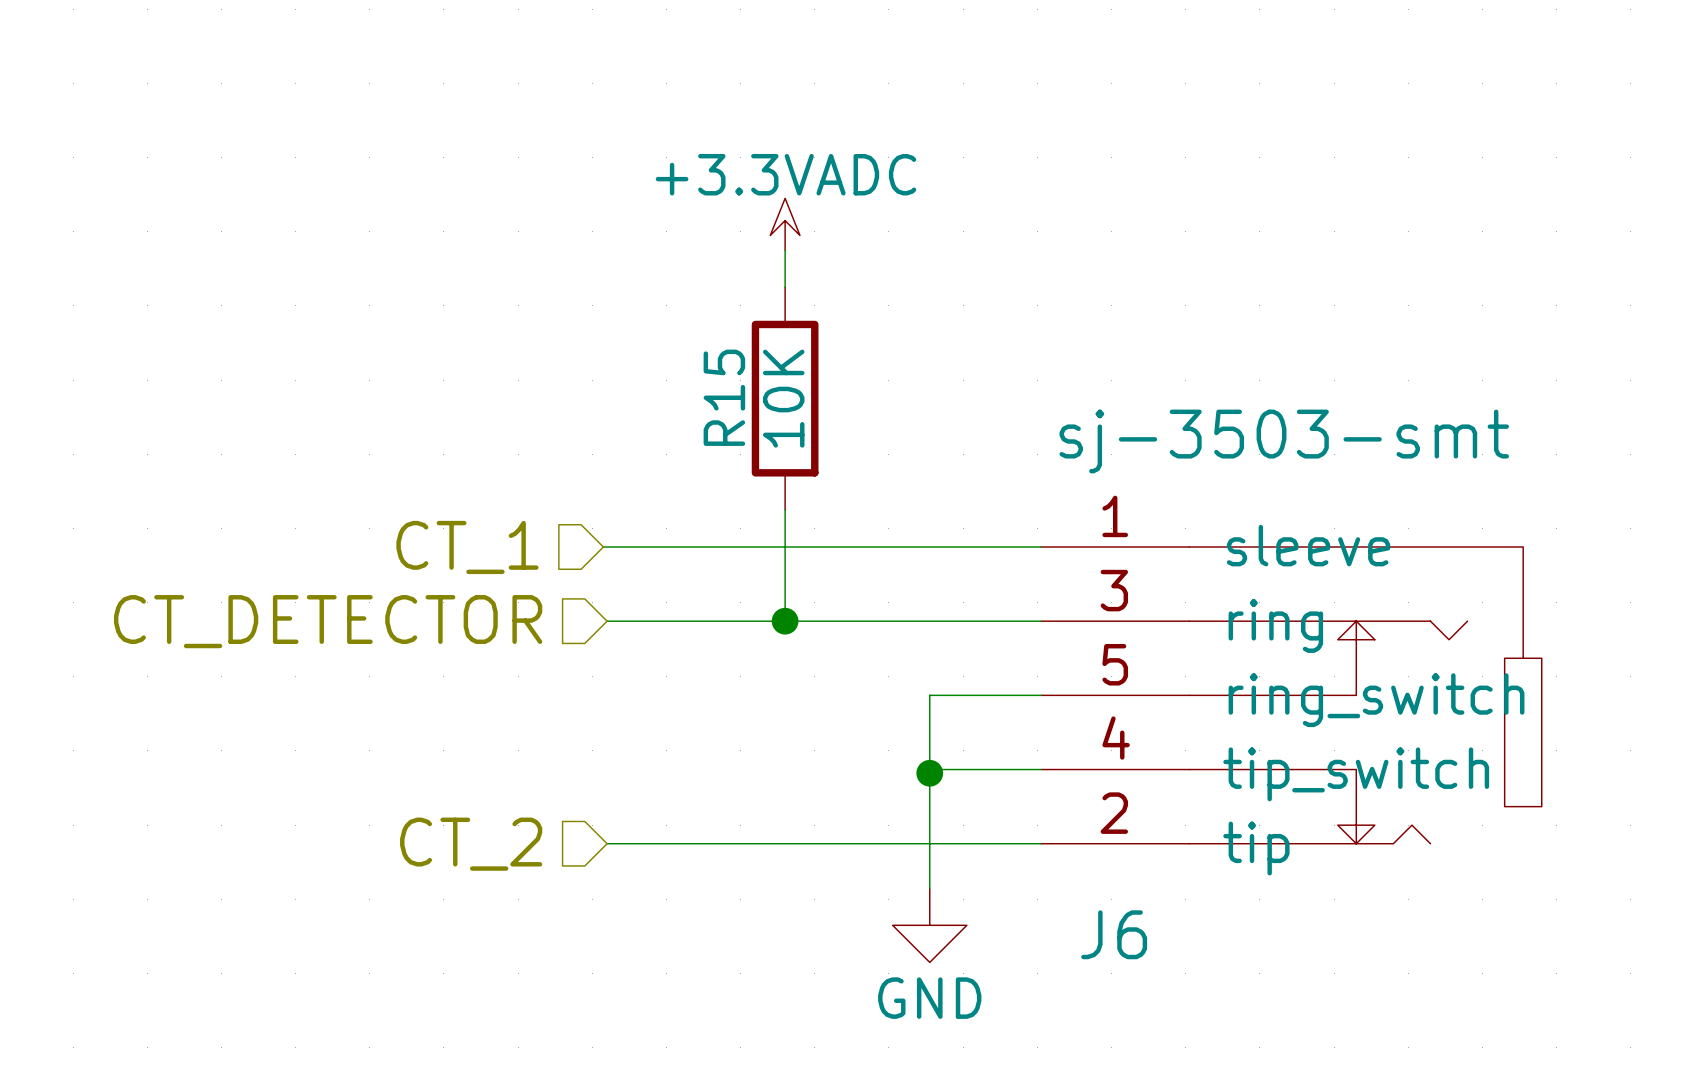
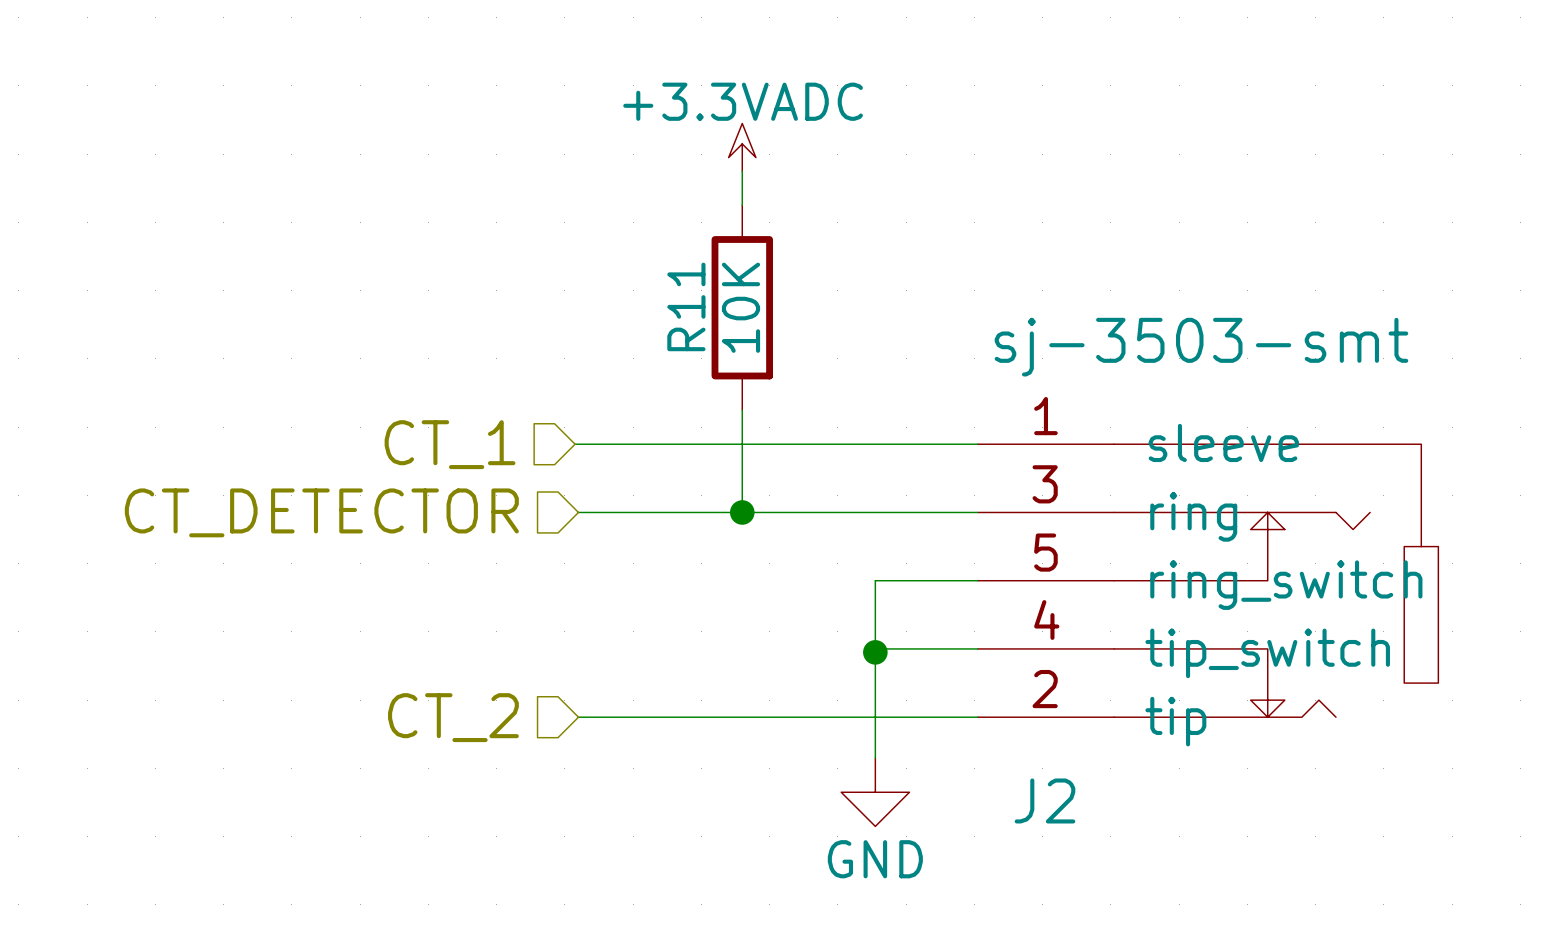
R15 name: R15 (724, 397) -> R11 (686, 306)
J6 name: J6 (1114, 934) -> J2 (1044, 800)

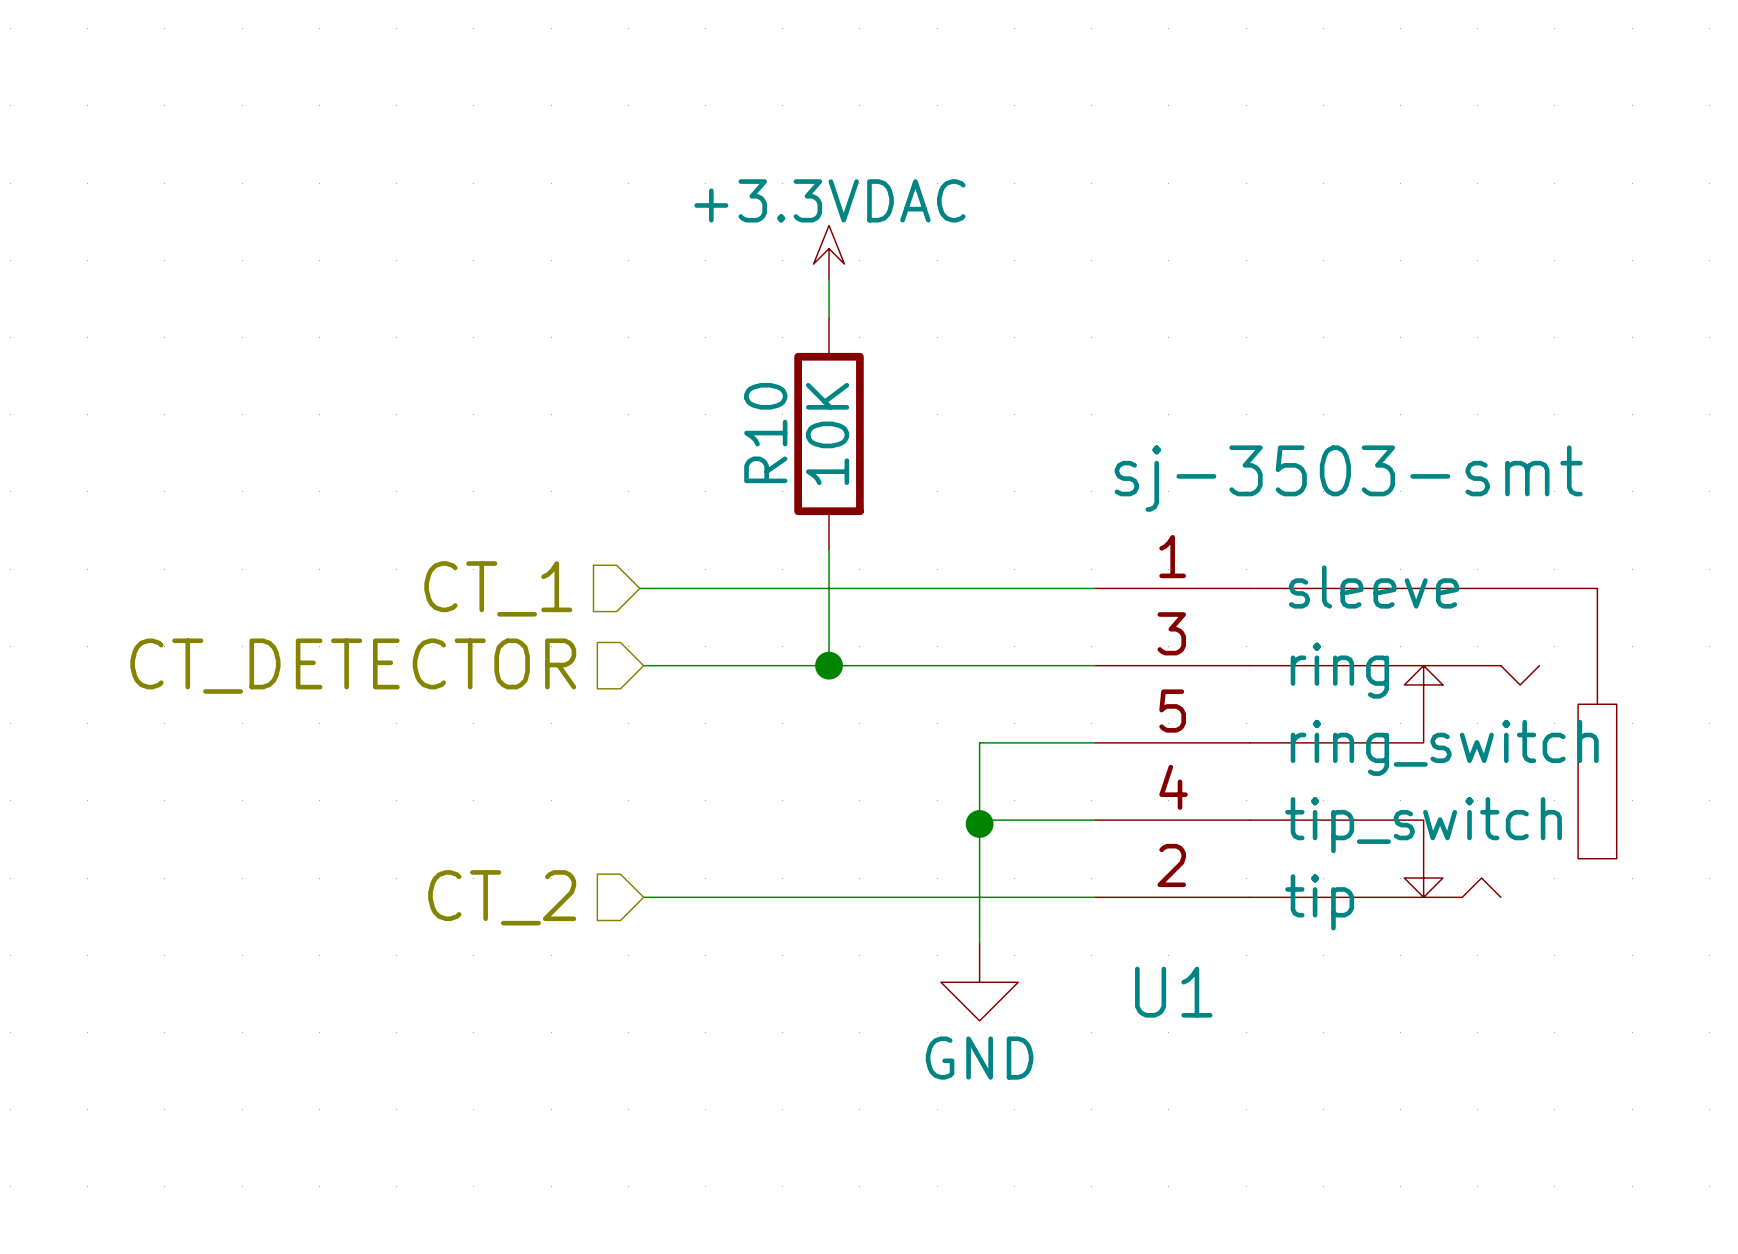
power symbol: +3.3VADC (742, 147) -> +3.3VDAC (829, 252)
R11 name: R11 (686, 306) -> R10 (765, 433)
J2 name: J2 (1044, 800) -> U1 (1173, 992)

